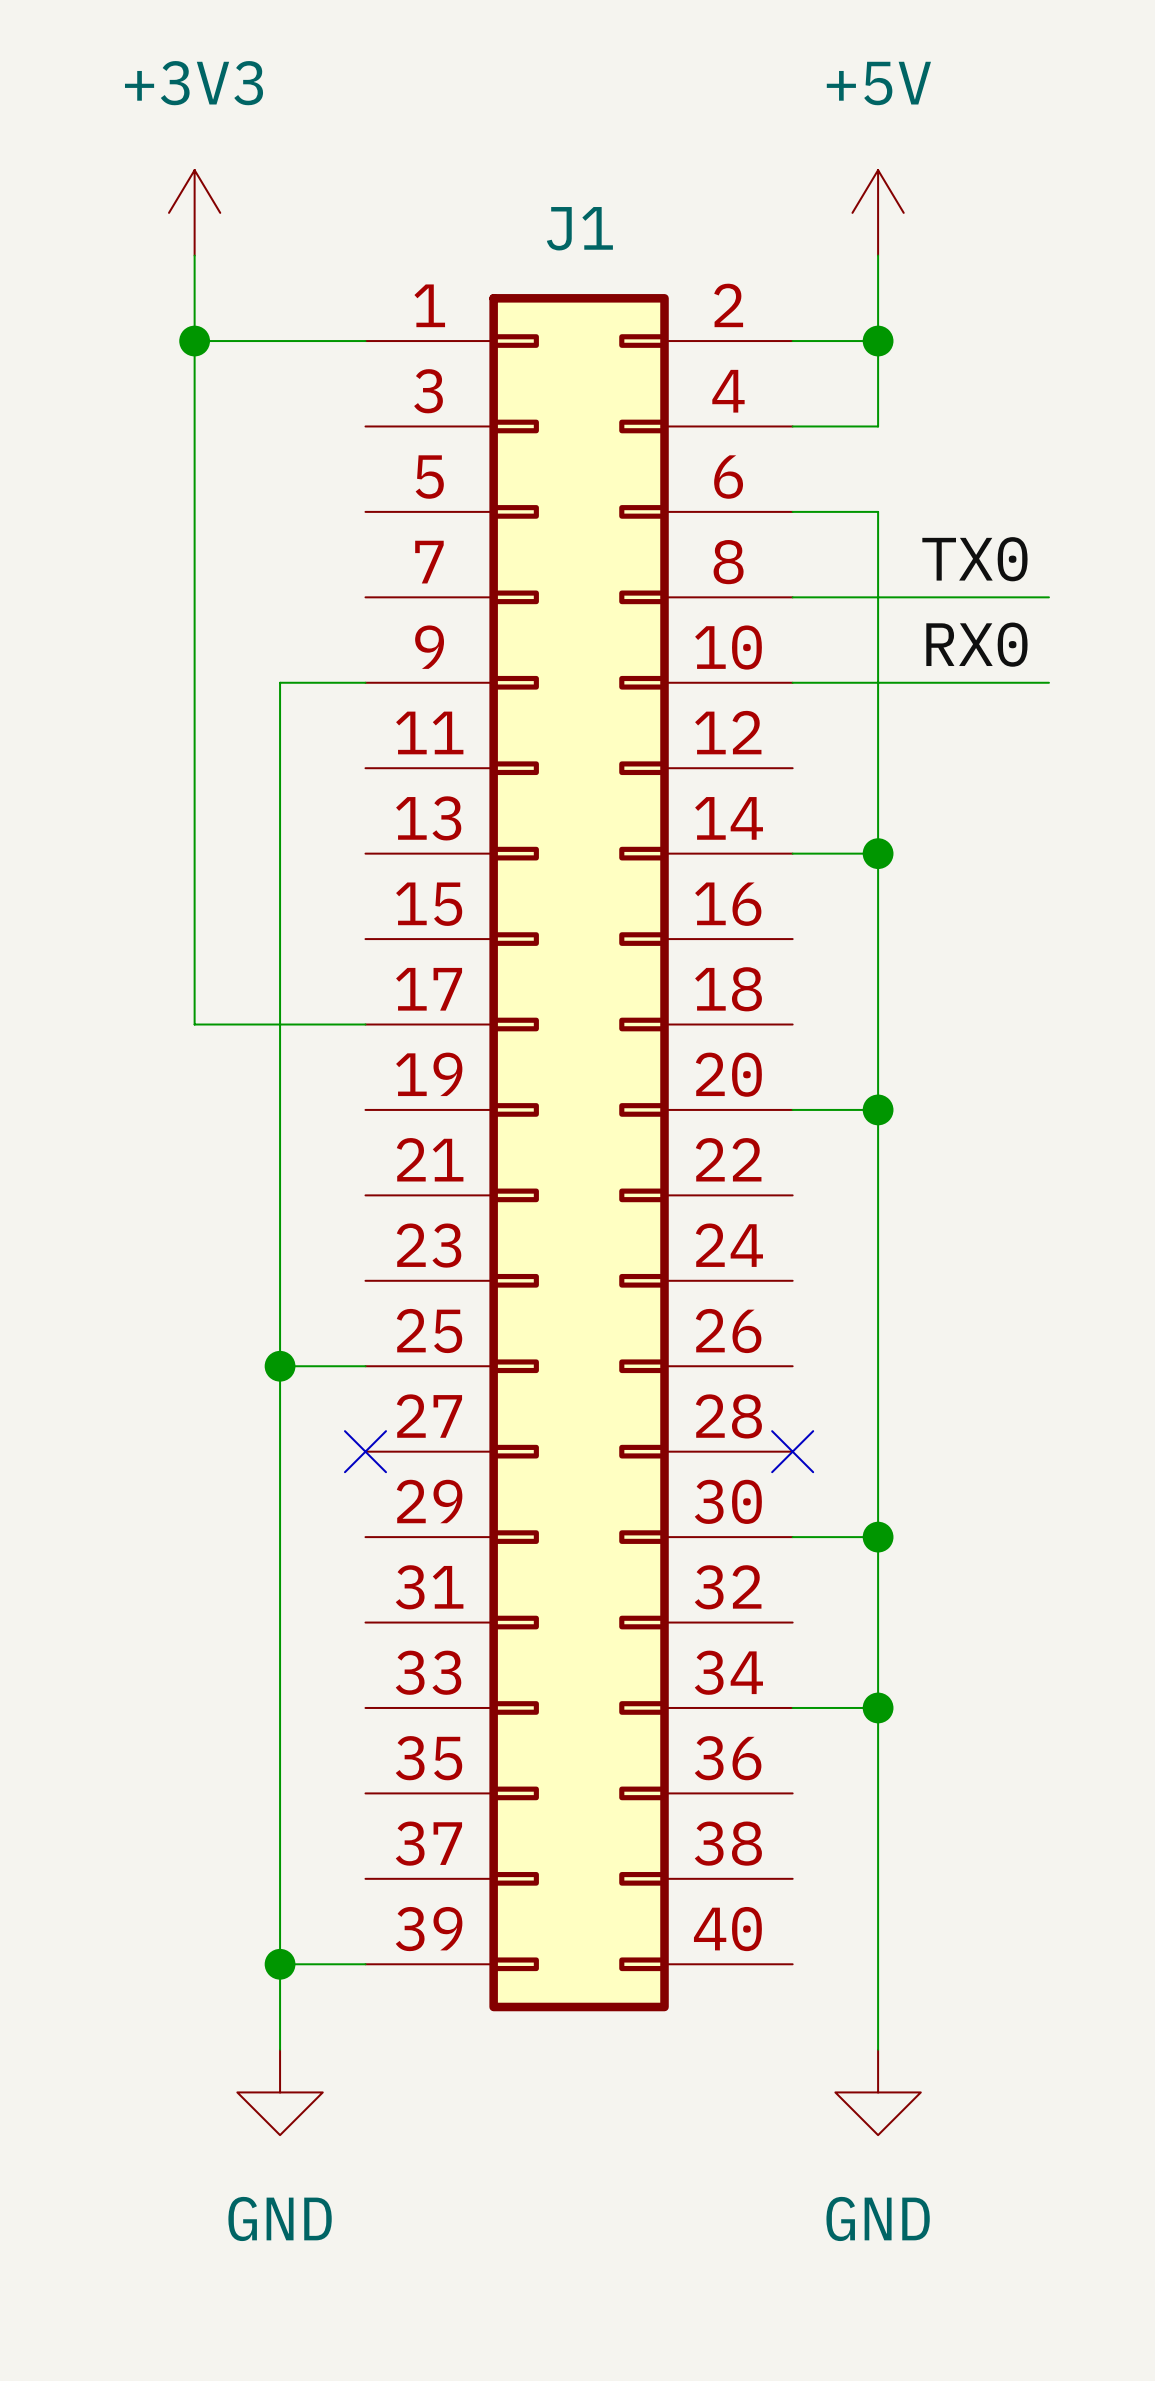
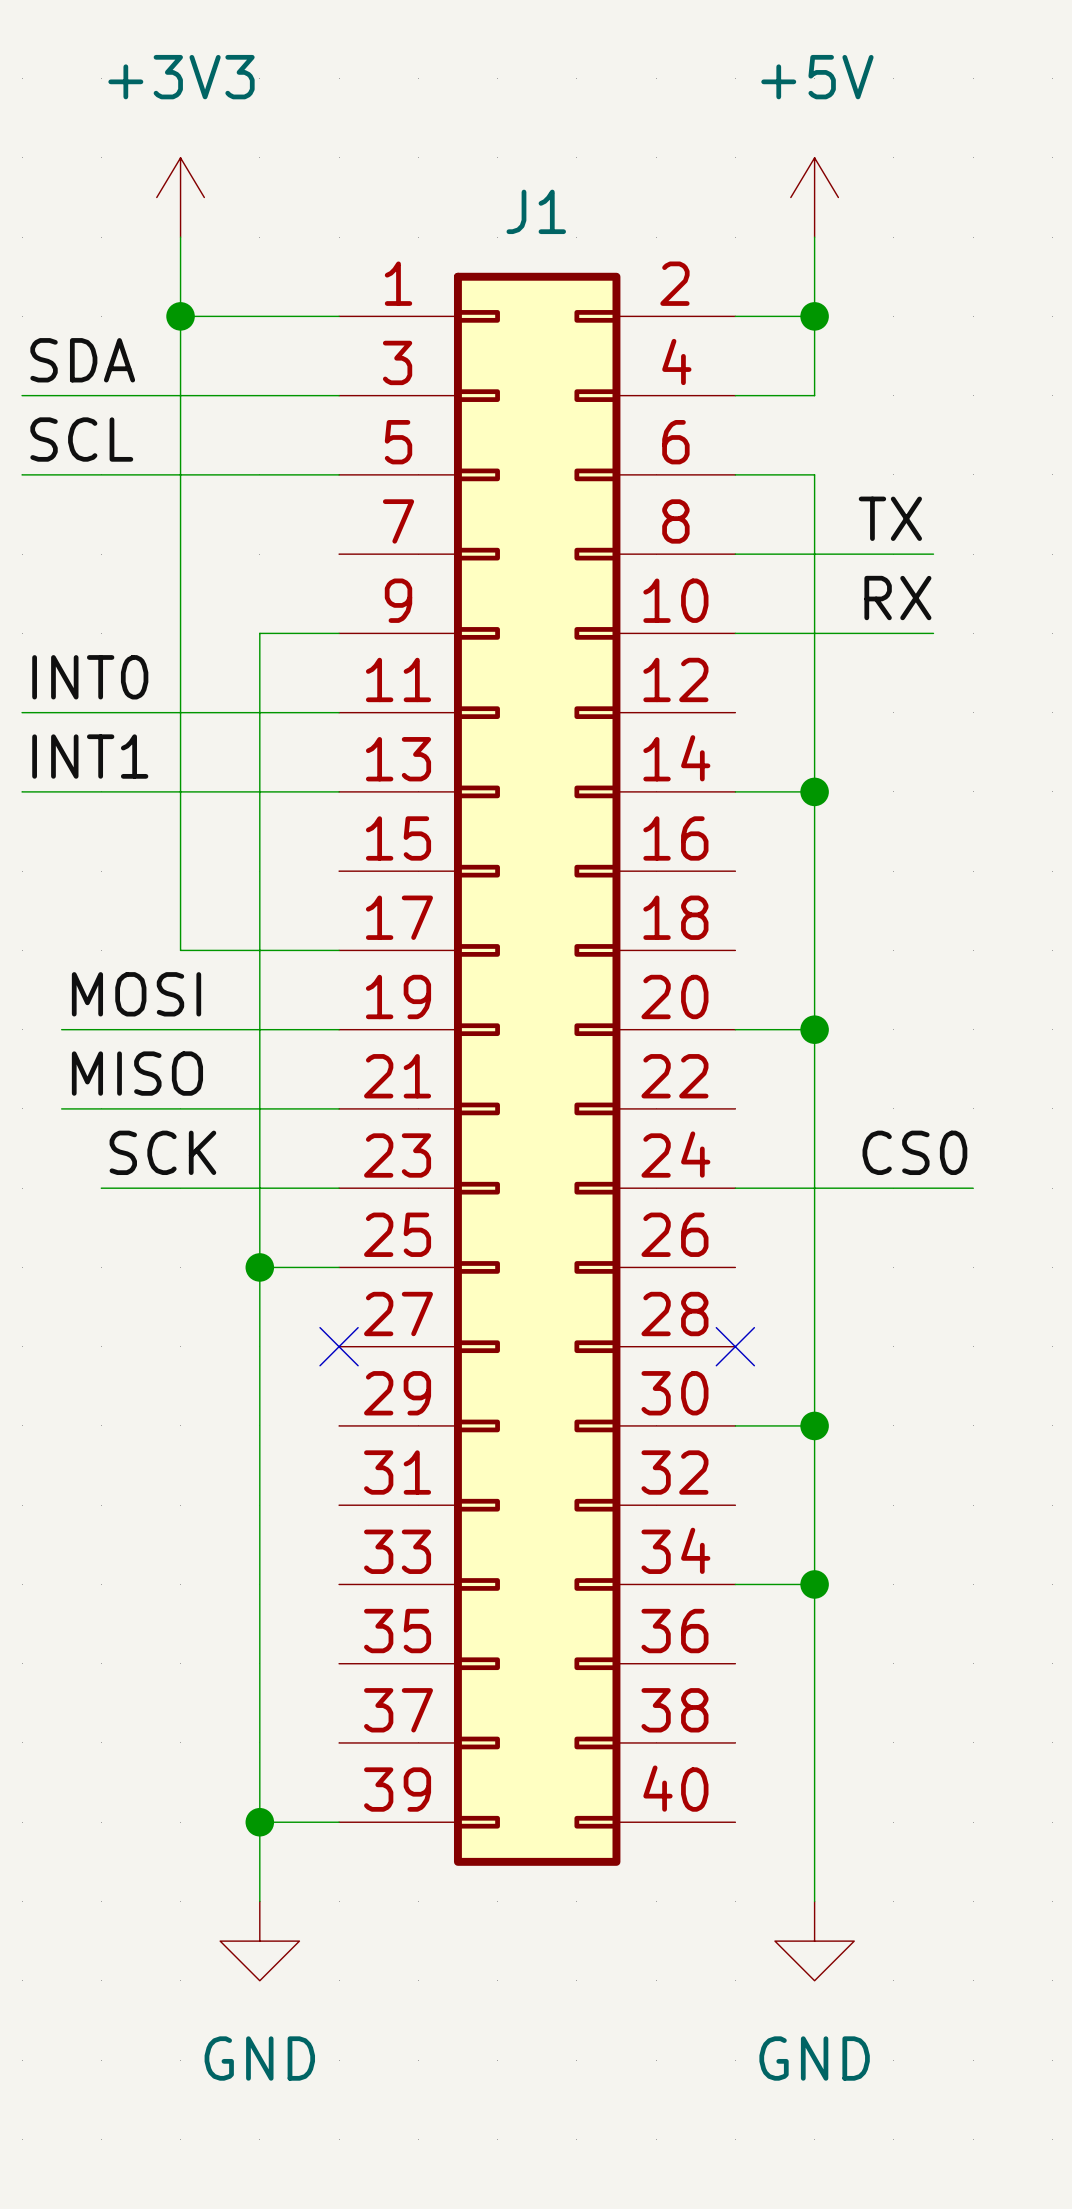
label: none -> SDA (82, 360)
wire: none -> (22, 395) (339, 395)
label: none -> SCL (81, 439)
wire: none -> (22, 474) (339, 474)
label: TX0 (974, 559) -> TX (890, 518)
wire: (1006, 597) (1048, 597) -> none
label: RX0 (976, 644) -> RX (897, 598)
wire: (1006, 682) (1048, 682) -> none
label: none -> INT0 (90, 677)
wire: none -> (22, 712) (339, 712)
label: none -> INT1 (90, 756)
wire: none -> (22, 791) (339, 791)
label: none -> MOSI (136, 994)
wire: none -> (61, 1029) (339, 1029)
label: none -> MISO (137, 1073)
wire: none -> (61, 1108) (339, 1108)
label: none -> SCK (162, 1152)
label: none -> CS0 (914, 1152)
wire: none -> (101, 1188) (339, 1188)
wire: none -> (735, 1188) (973, 1188)

